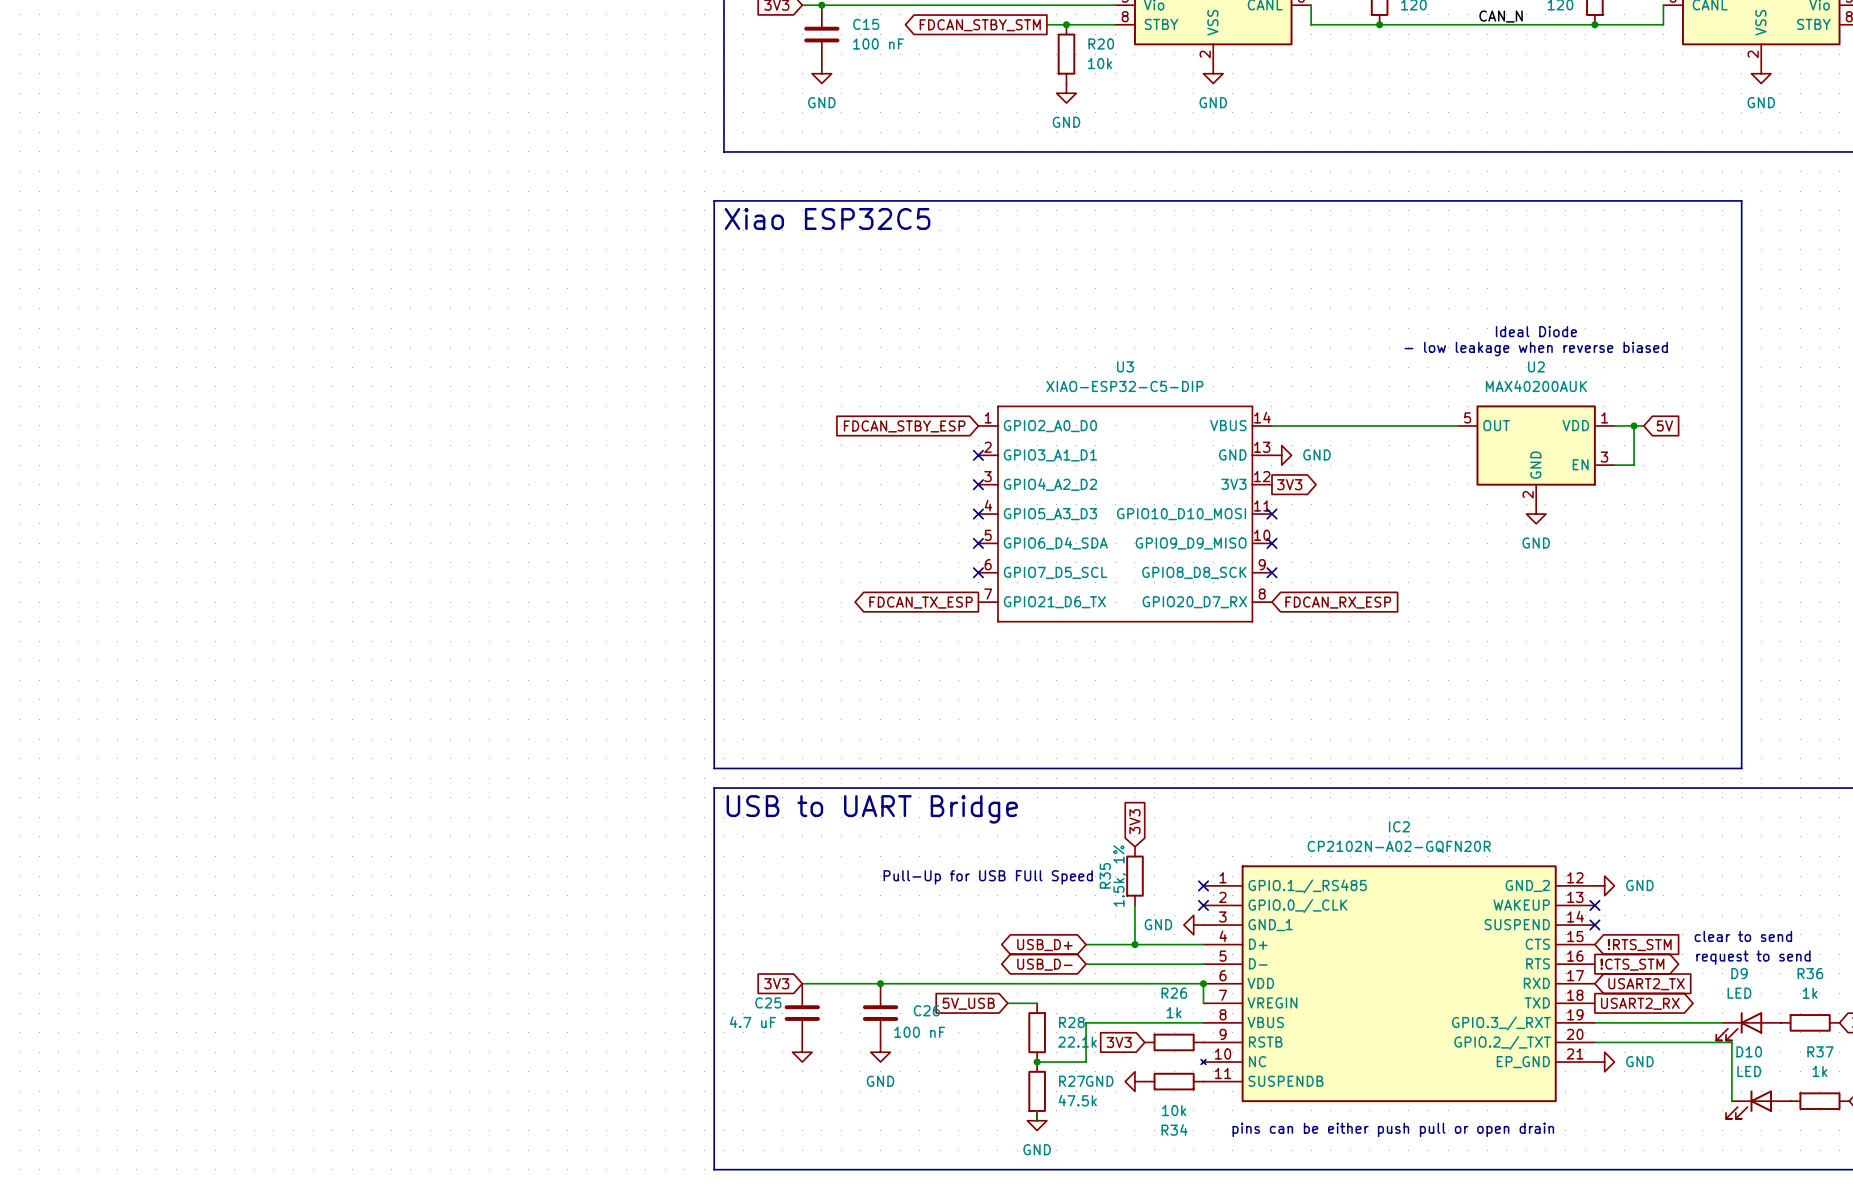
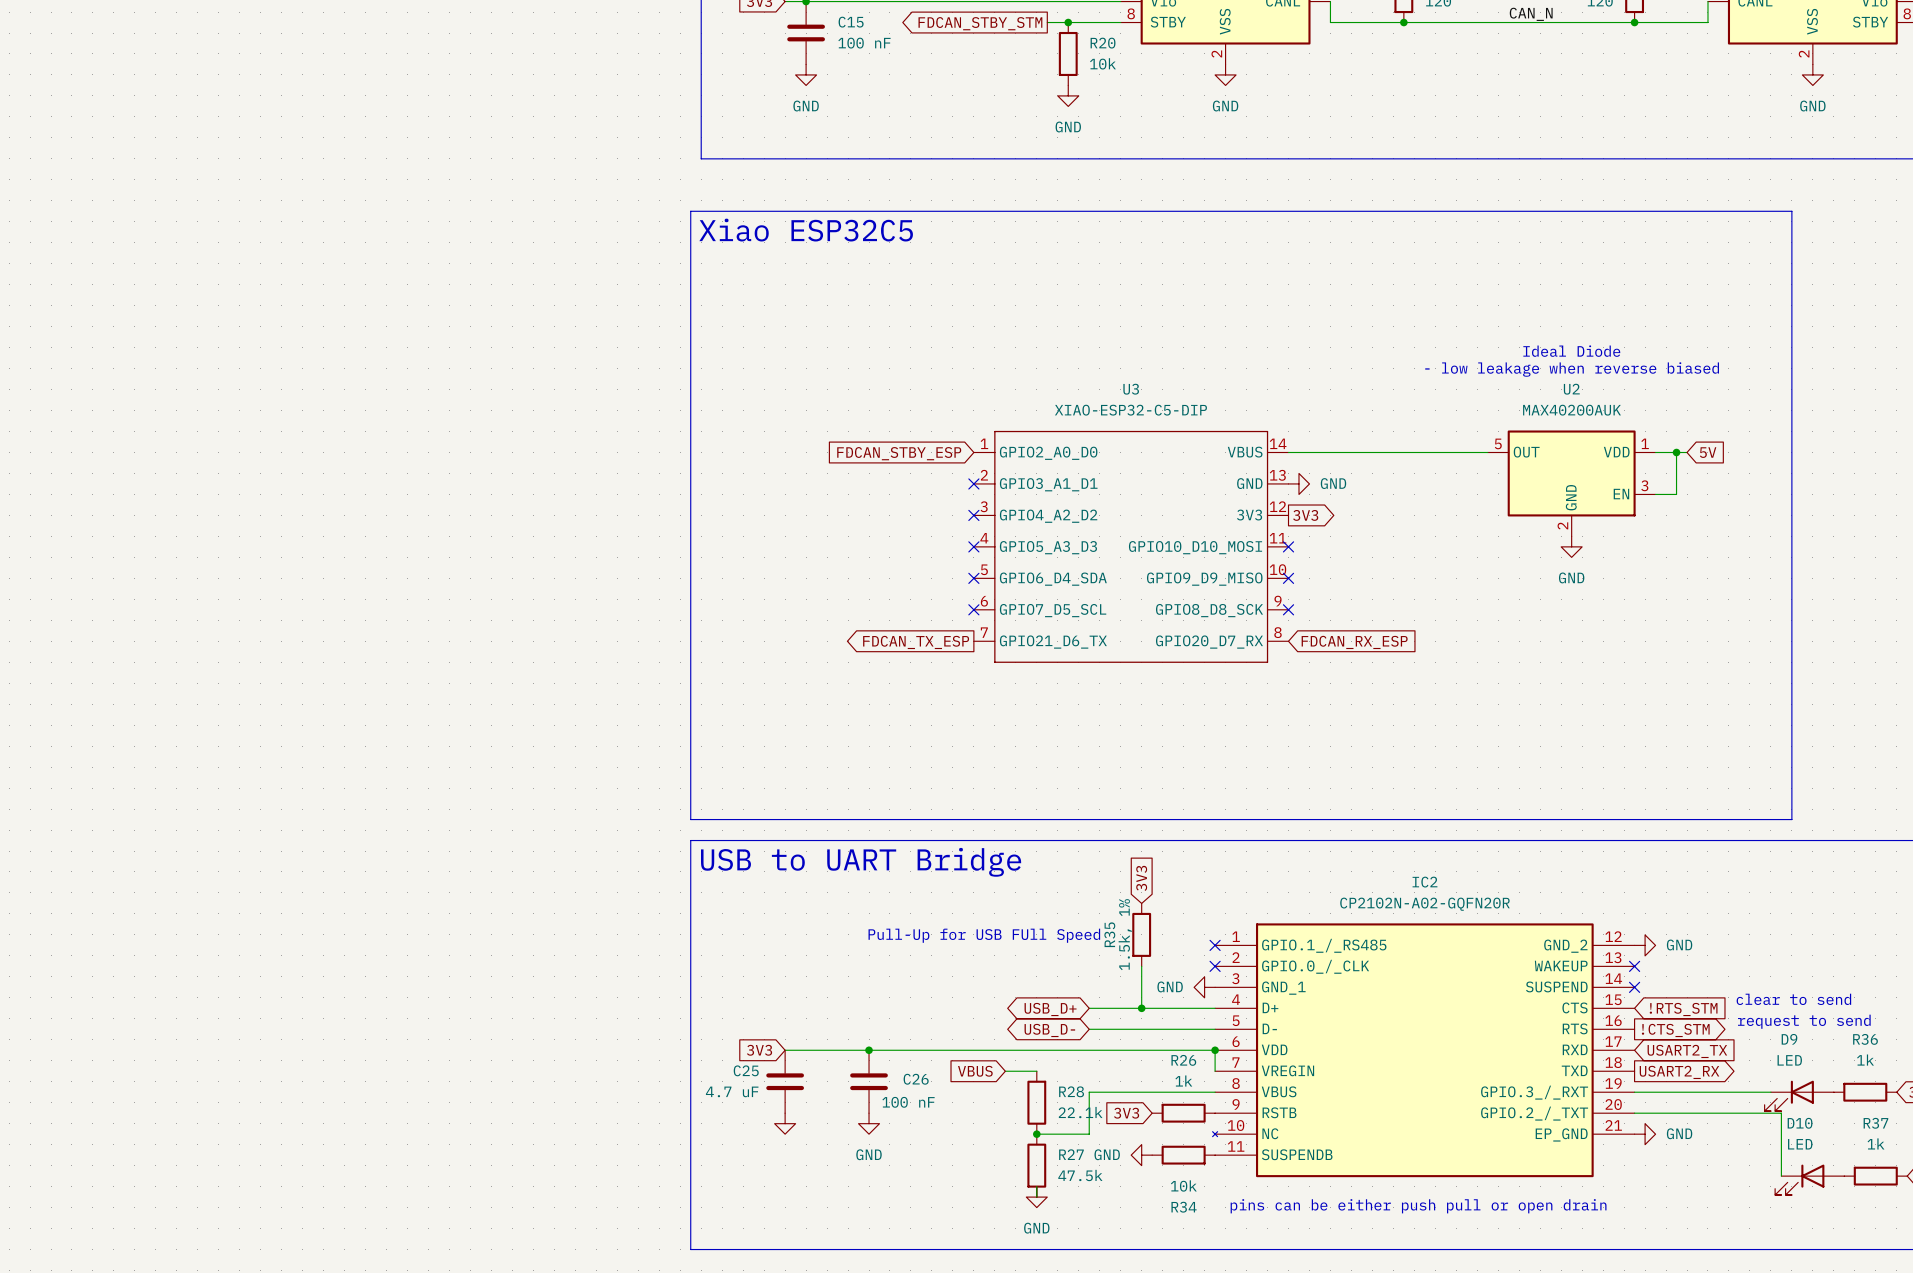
global label: 5V_USB (968, 1003) -> VBUS (975, 1071)

